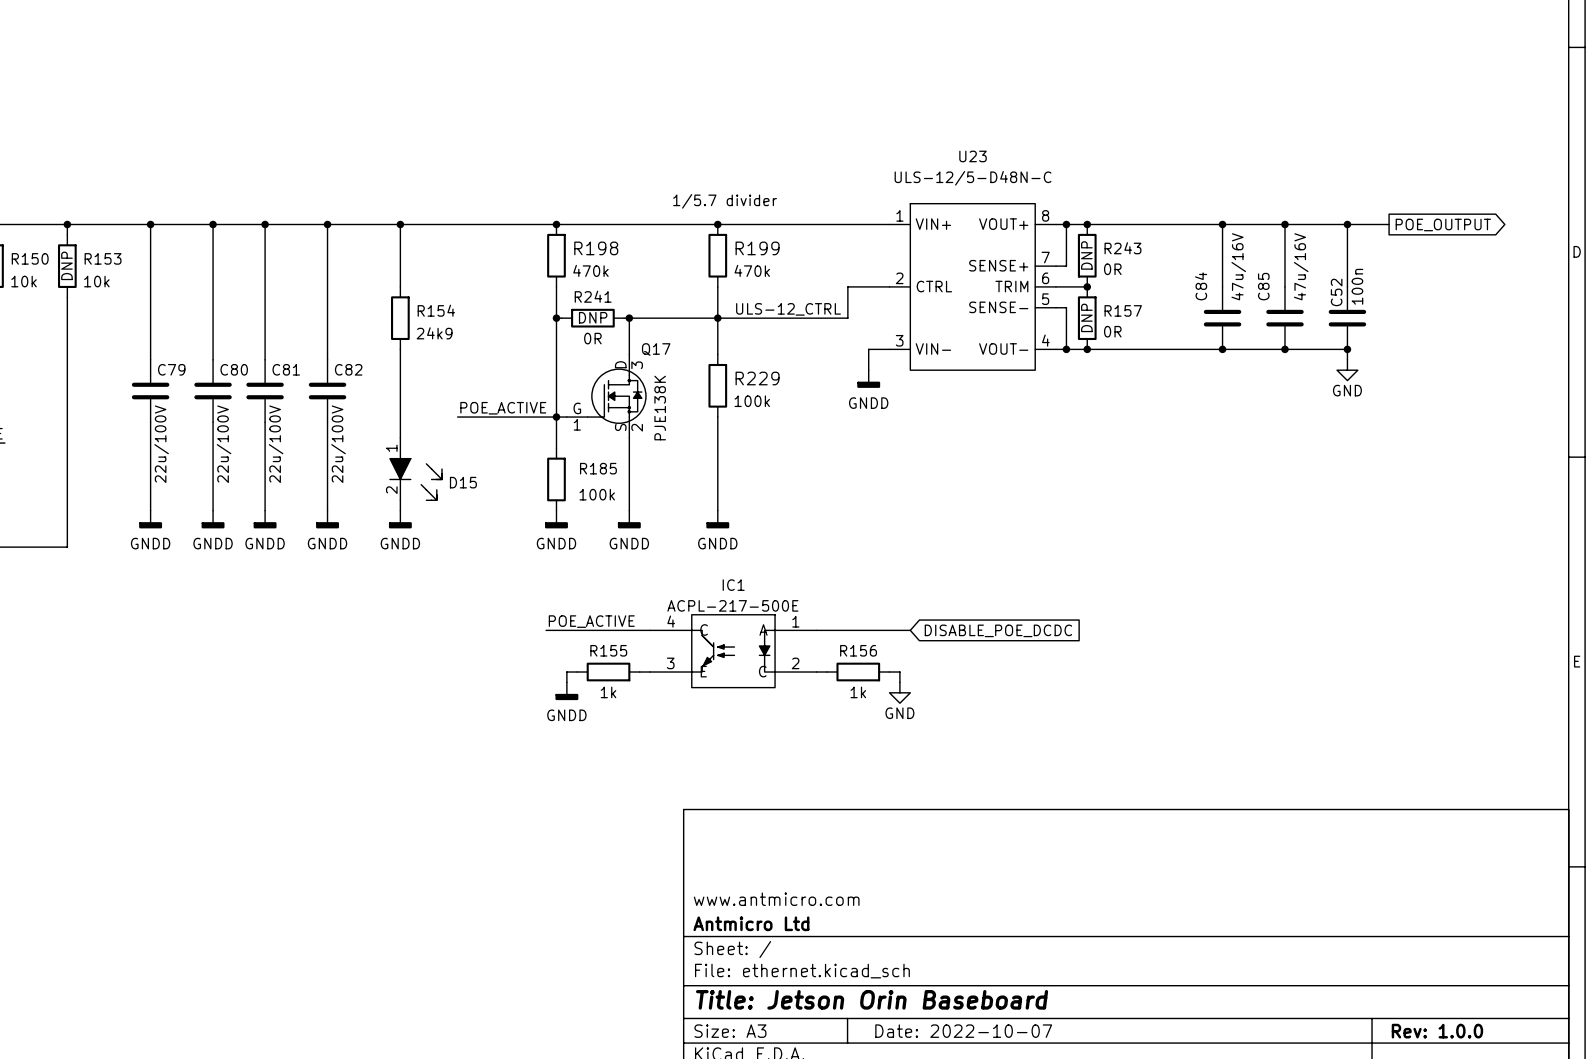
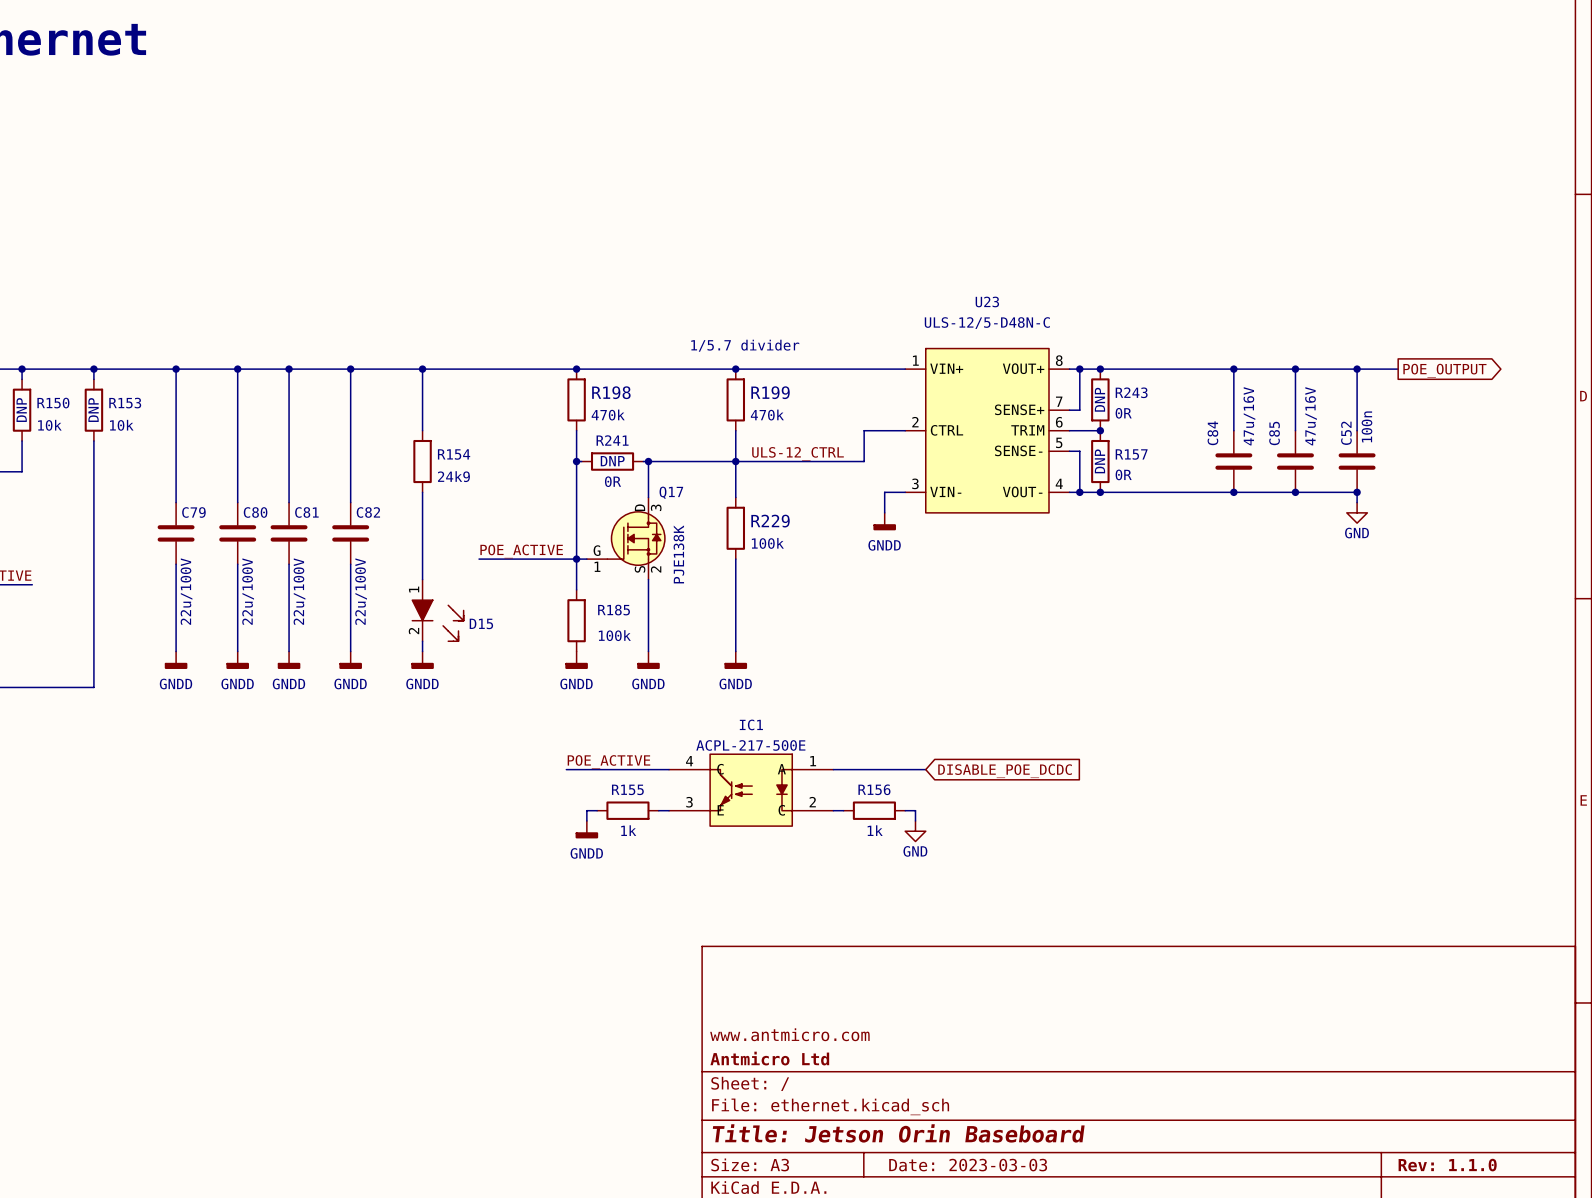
title block: Date: 2022-10-07 (963, 1031) -> Date: 2023-03-03 (968, 1165)
title block: Rev: 1.0.0 (1437, 1031) -> Rev: 1.1.0 (1447, 1165)

